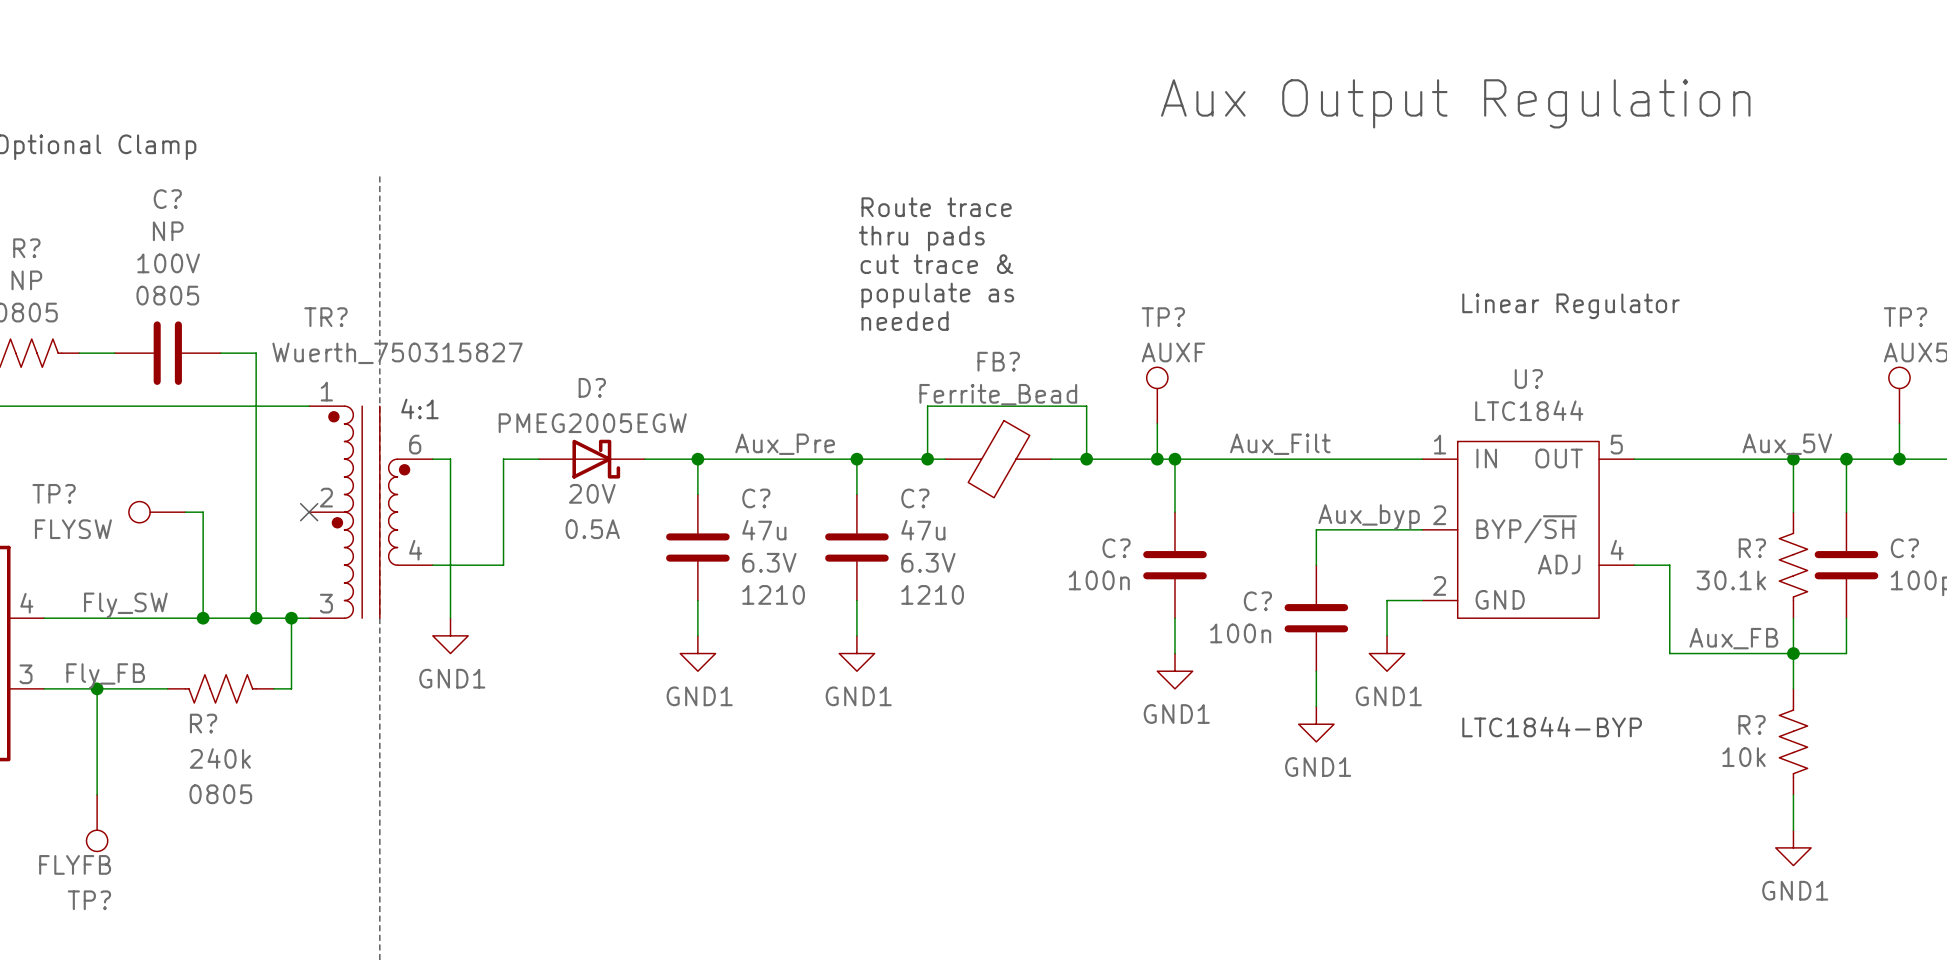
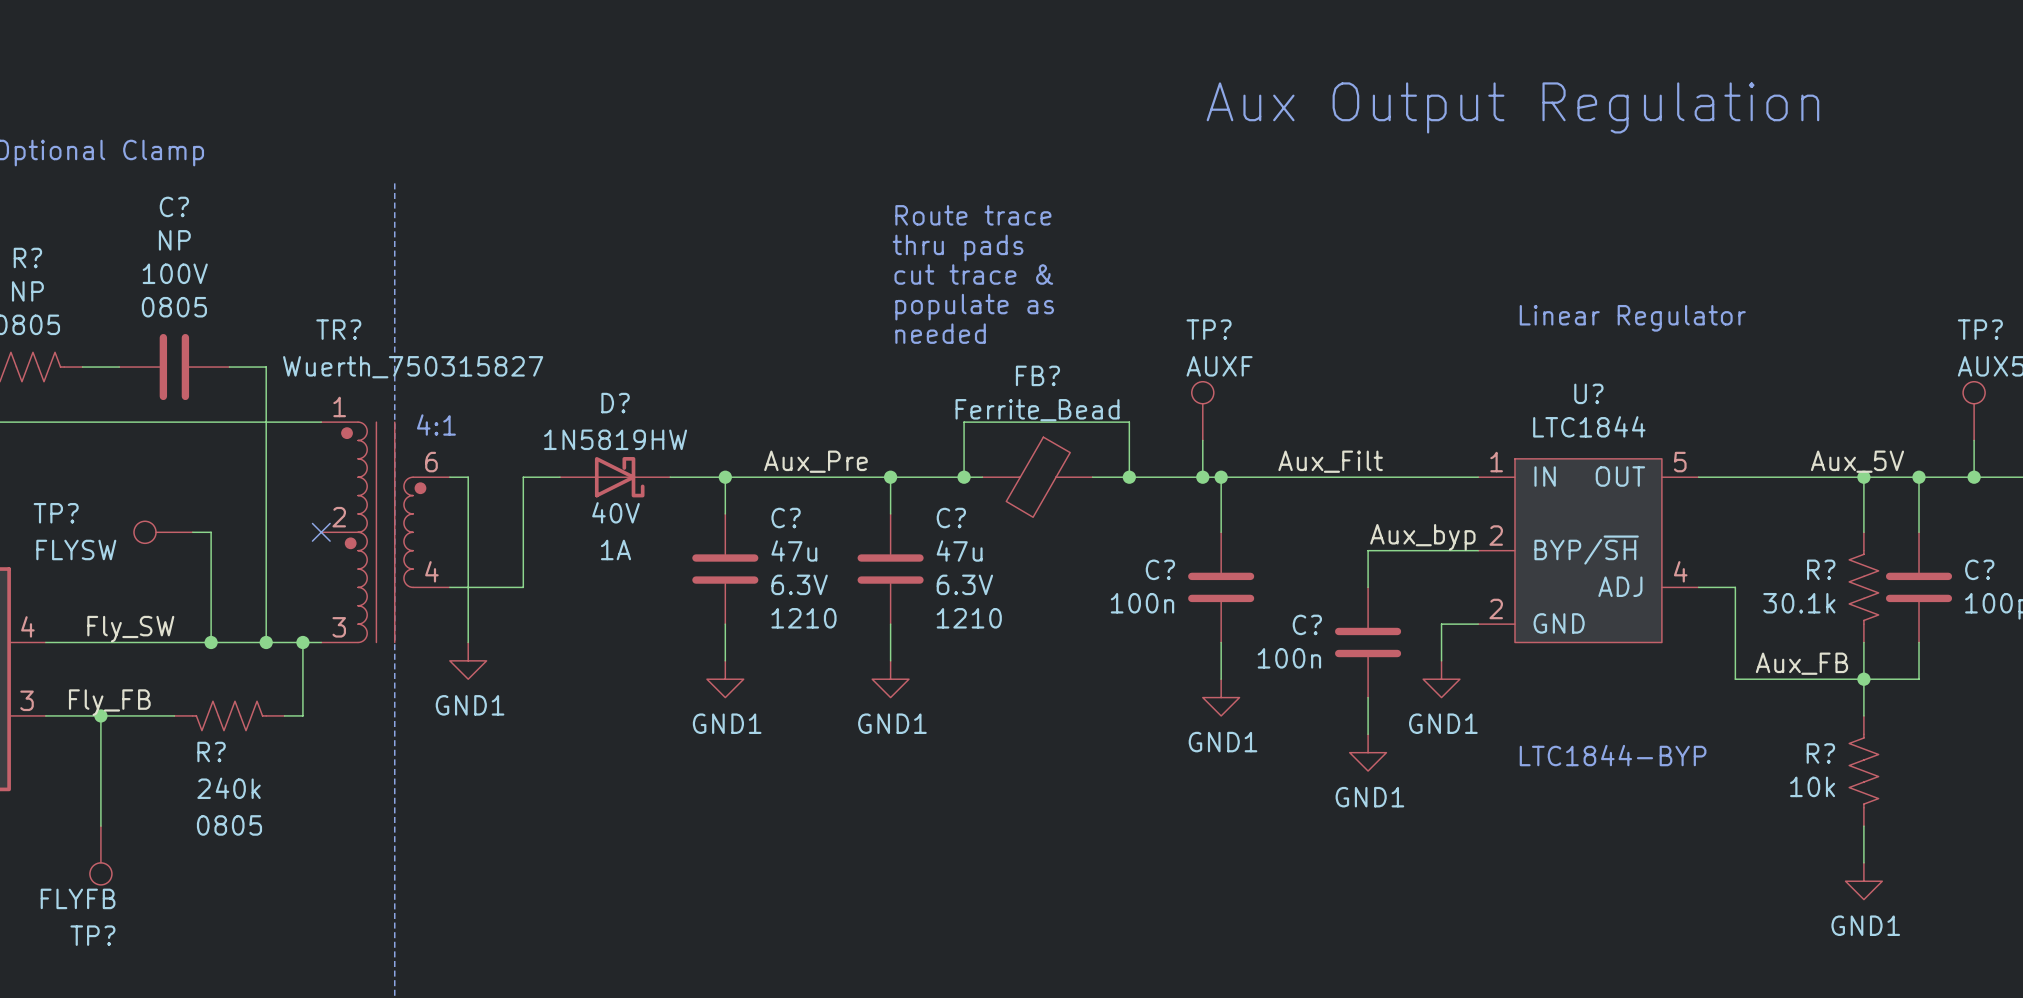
D? value: PMEG2005EGW (592, 423) -> 1N5819HW (615, 439)
D? text: 20V (592, 493) -> 40V (616, 512)
D? text: 0.5A (592, 529) -> 1A (616, 549)

